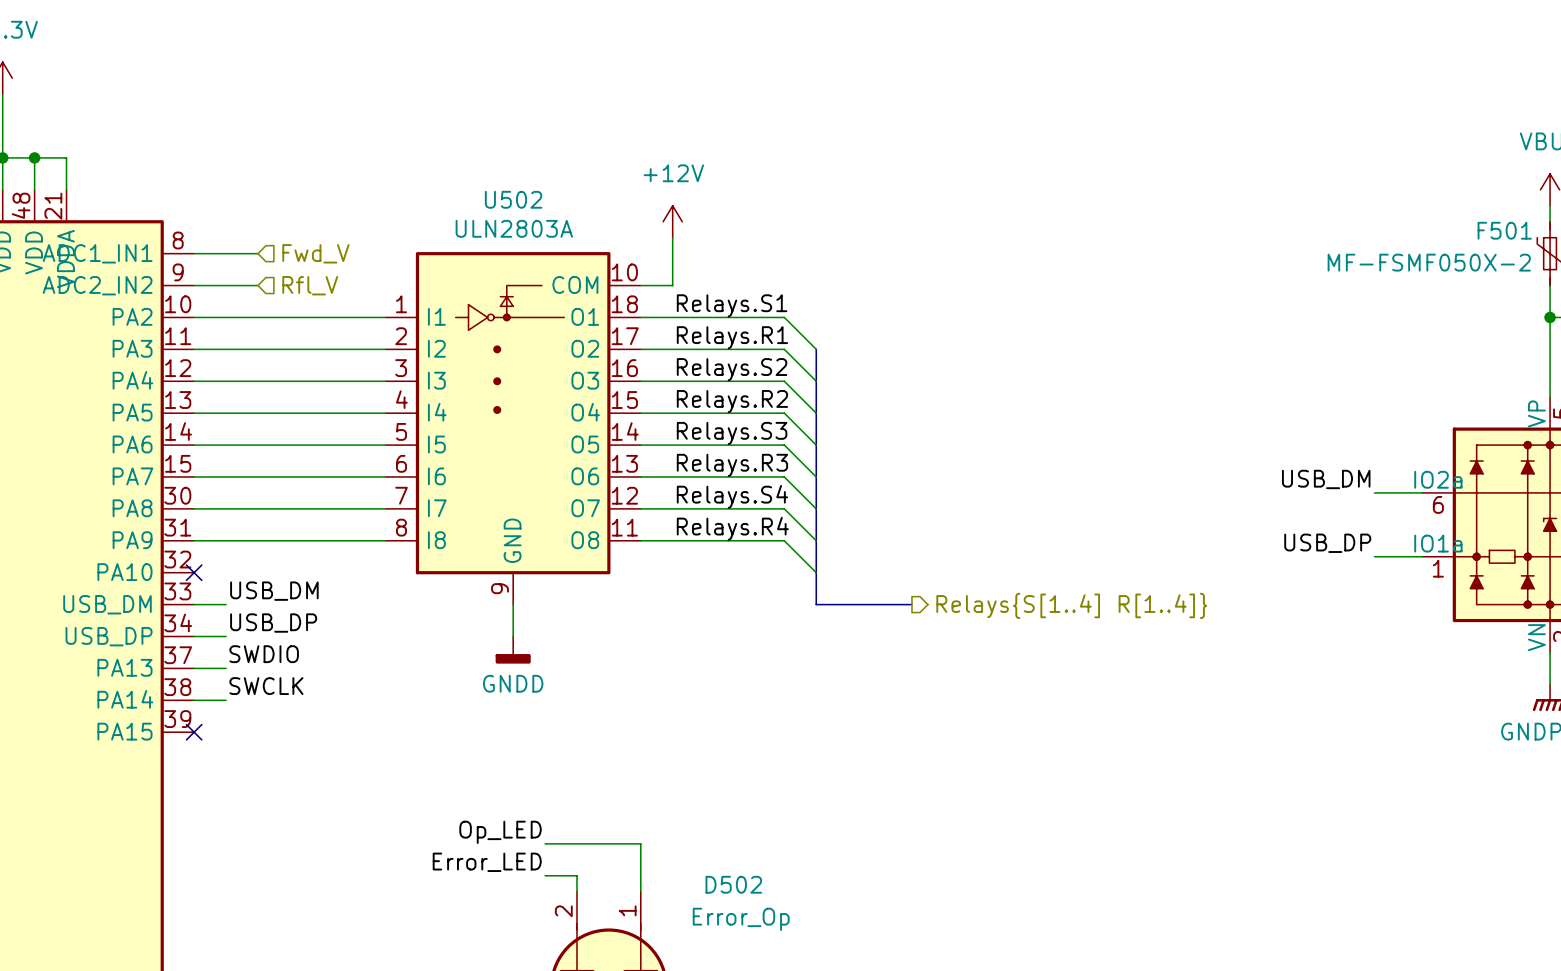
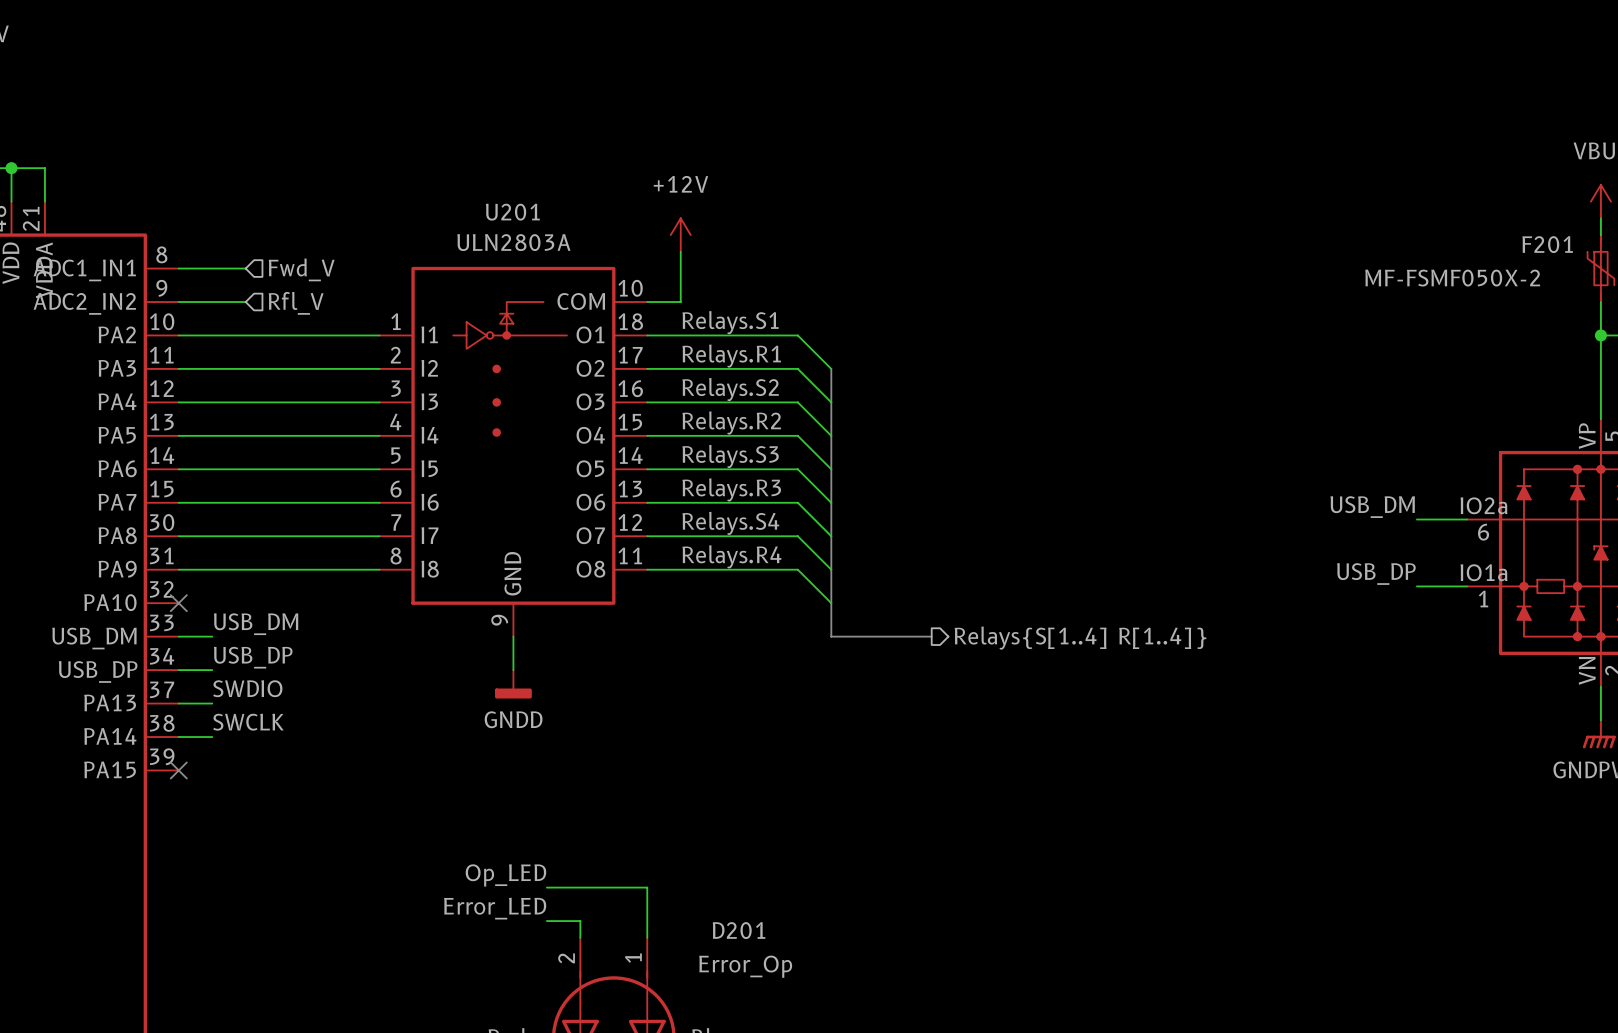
U502 name: U502 (513, 199) -> U201 (512, 212)
F501 name: F501 (1504, 230) -> F201 (1547, 244)
D502 name: D502 (733, 884) -> D201 (739, 930)

